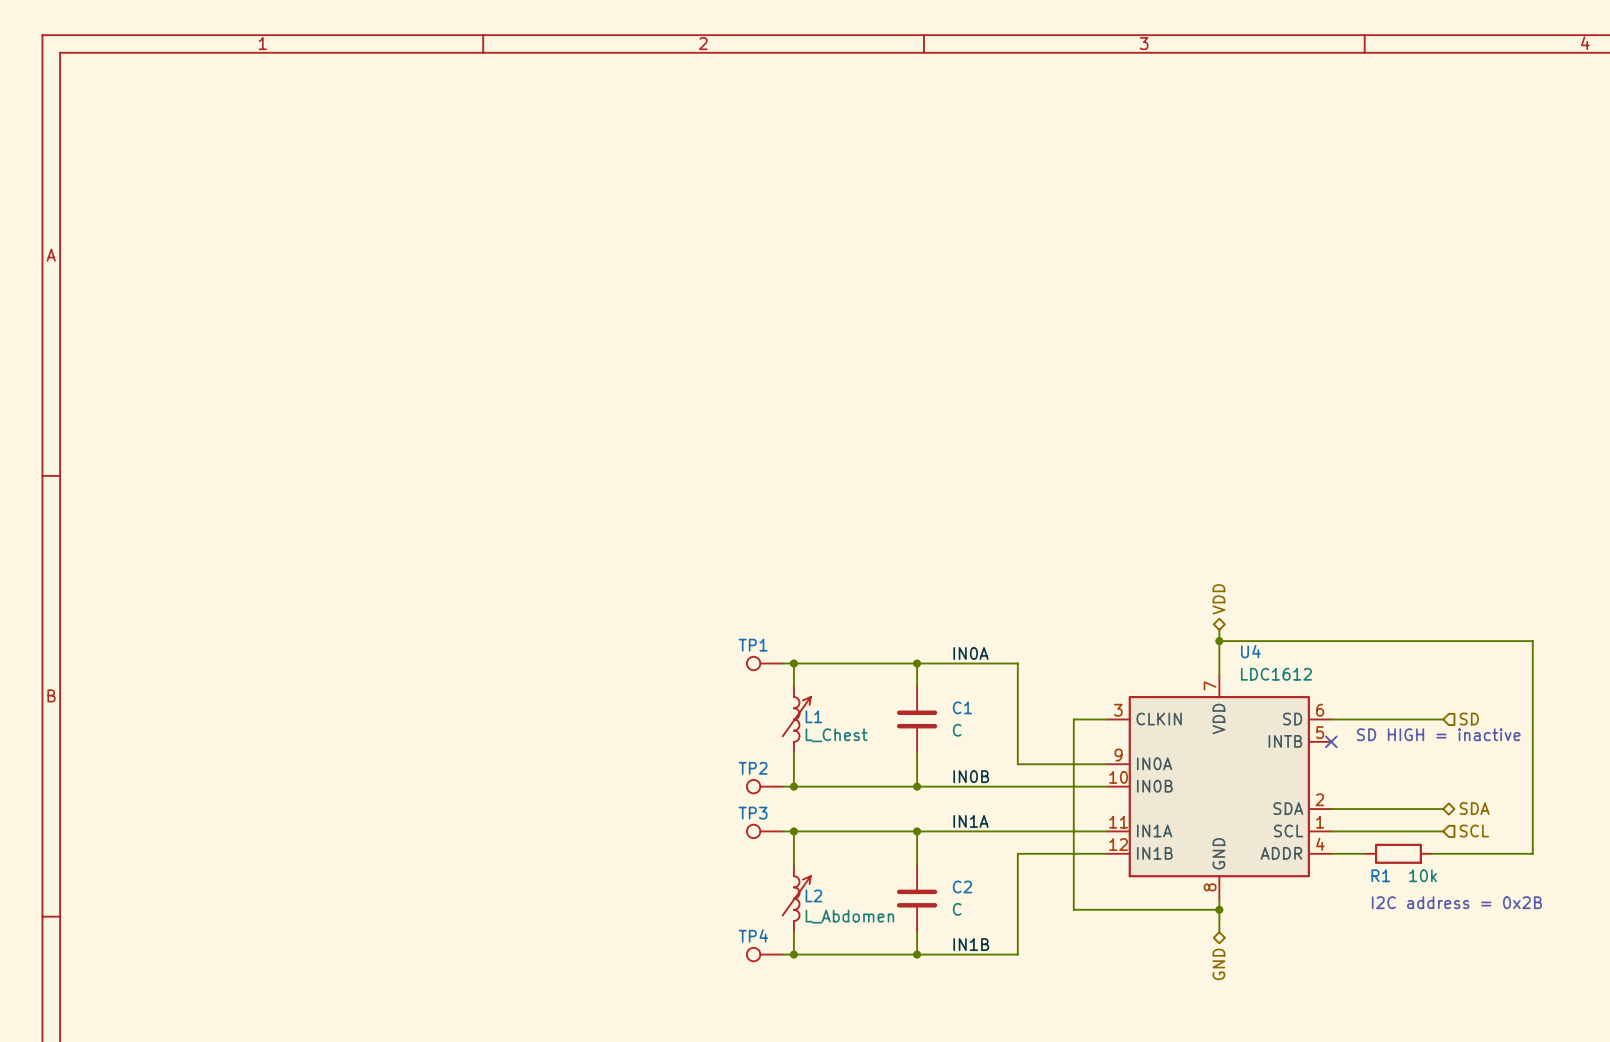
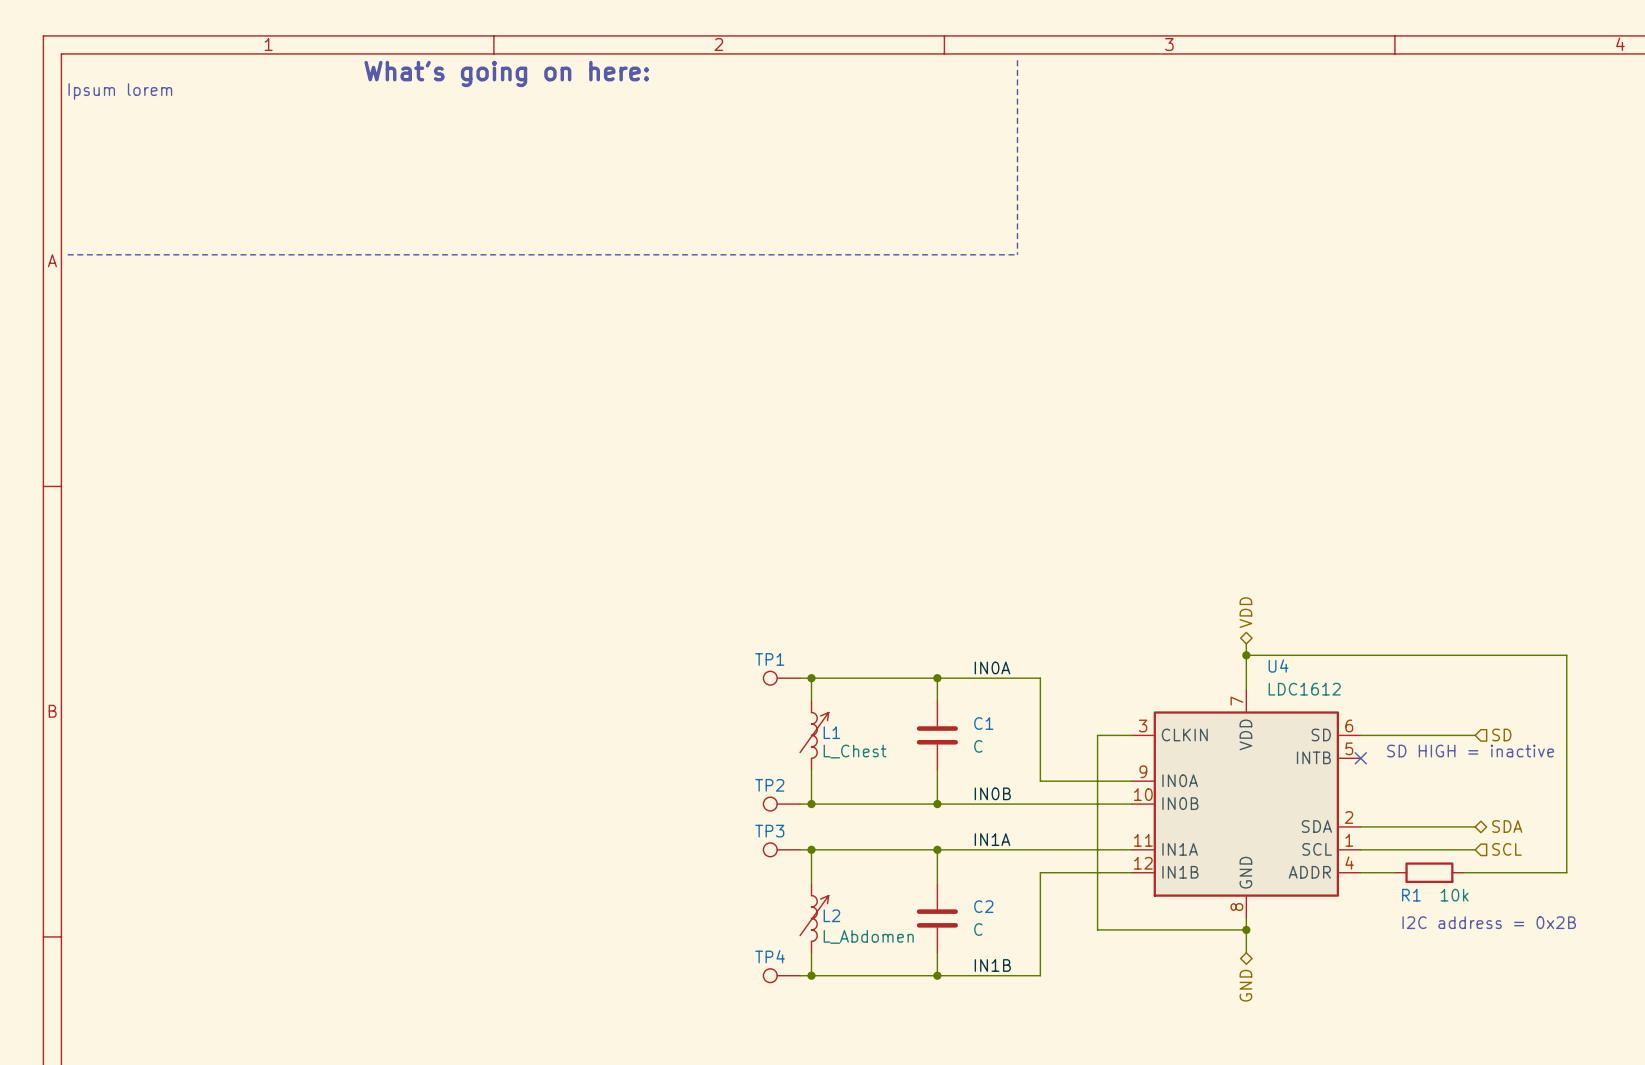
line: none -> (1017, 60) (1017, 254) (67, 254)
text: none -> What's going on here: (506, 73)
text: none -> Ipsum lorem (120, 91)

